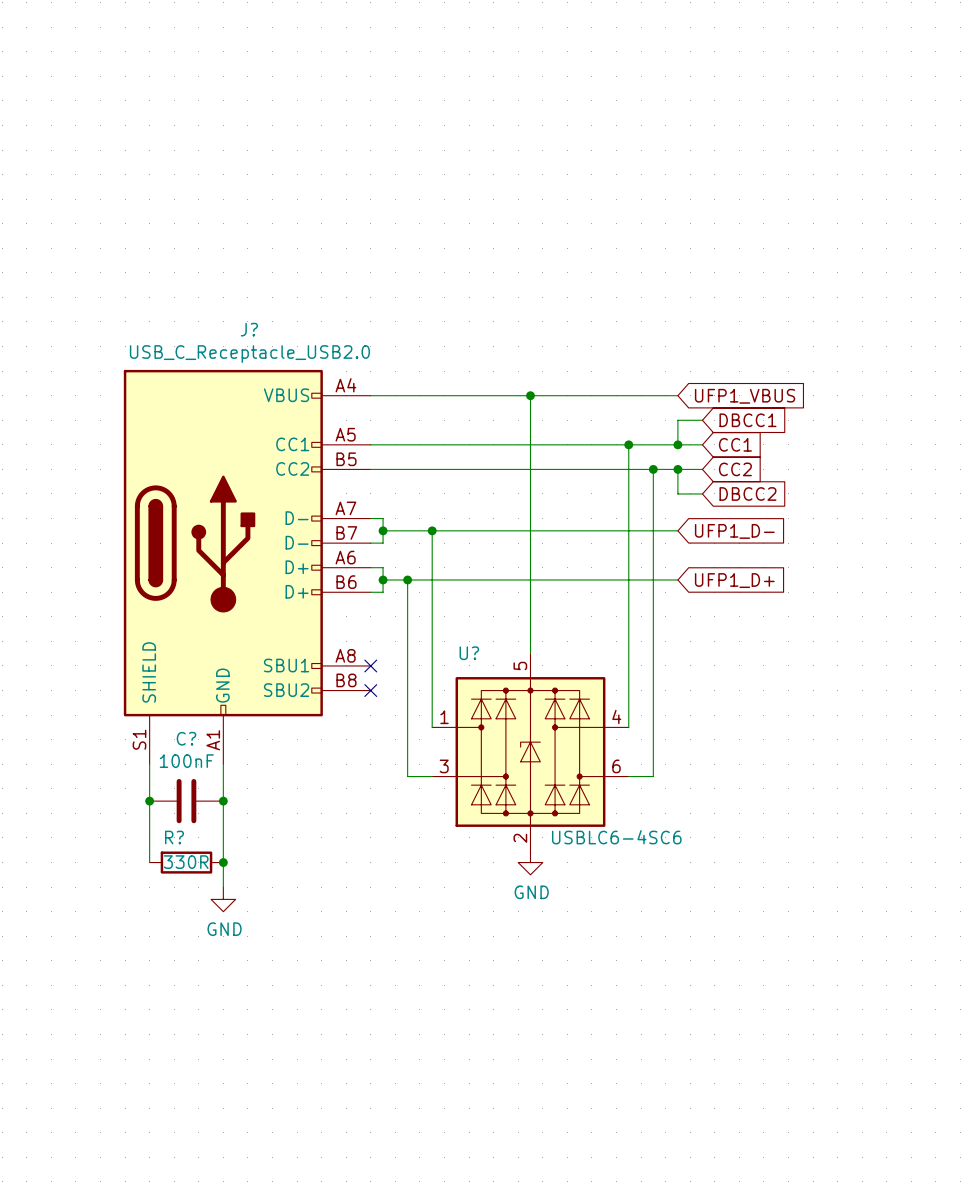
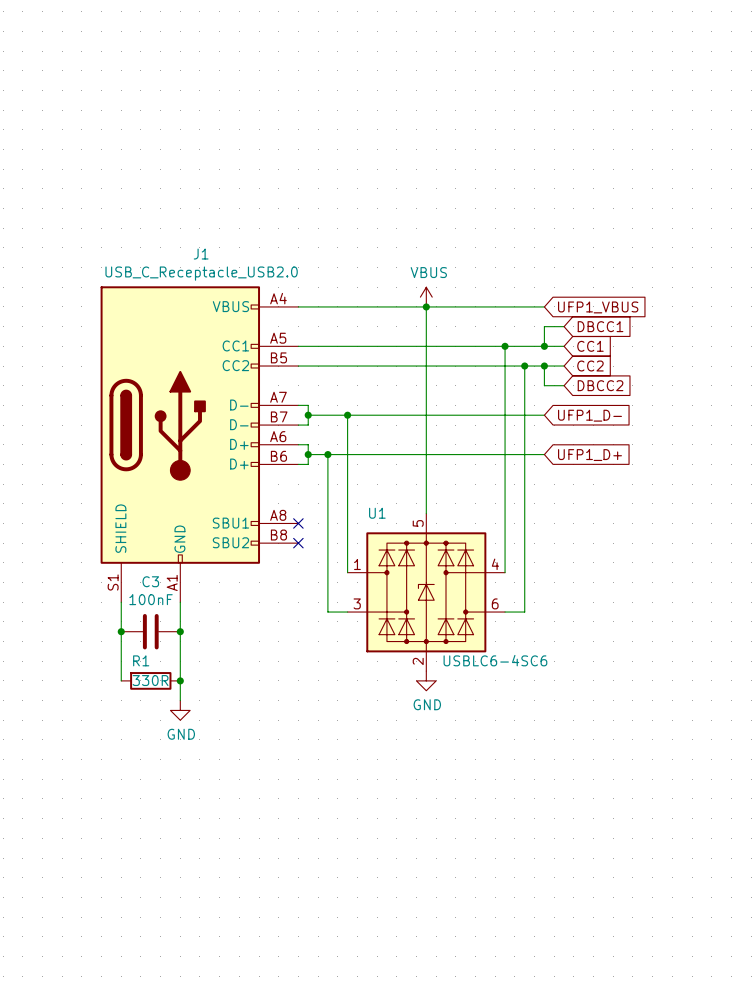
J? name: J? (249, 329) -> J1 (201, 254)
power symbol: none -> VBUS (426, 297)
U? name: U? (469, 653) -> U1 (377, 513)
C? name: C? (186, 738) -> C3 (150, 581)
R? name: R? (174, 837) -> R1 (141, 660)

